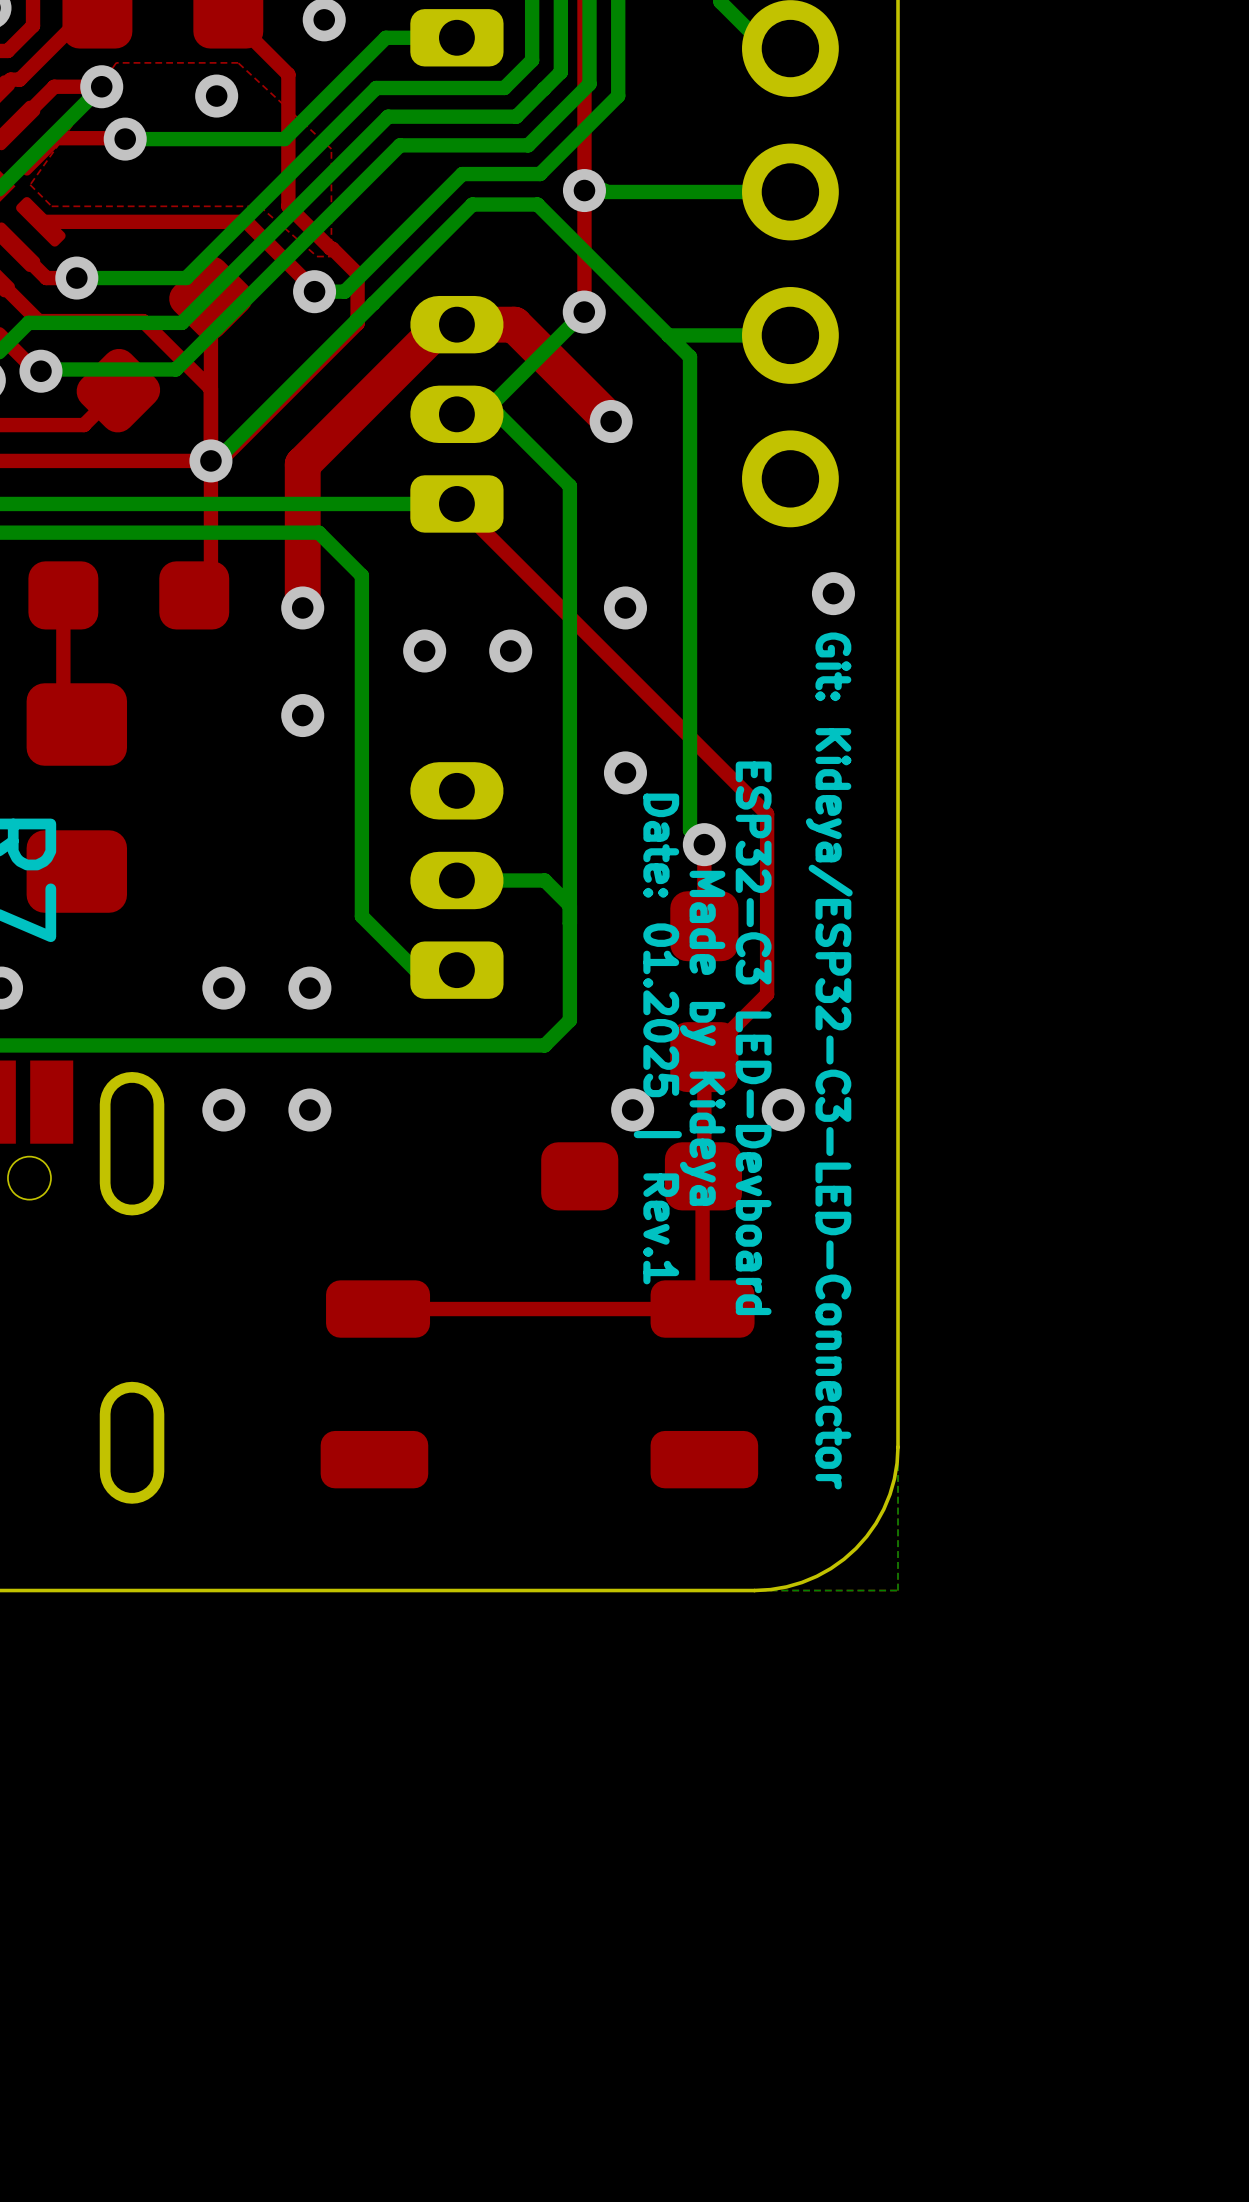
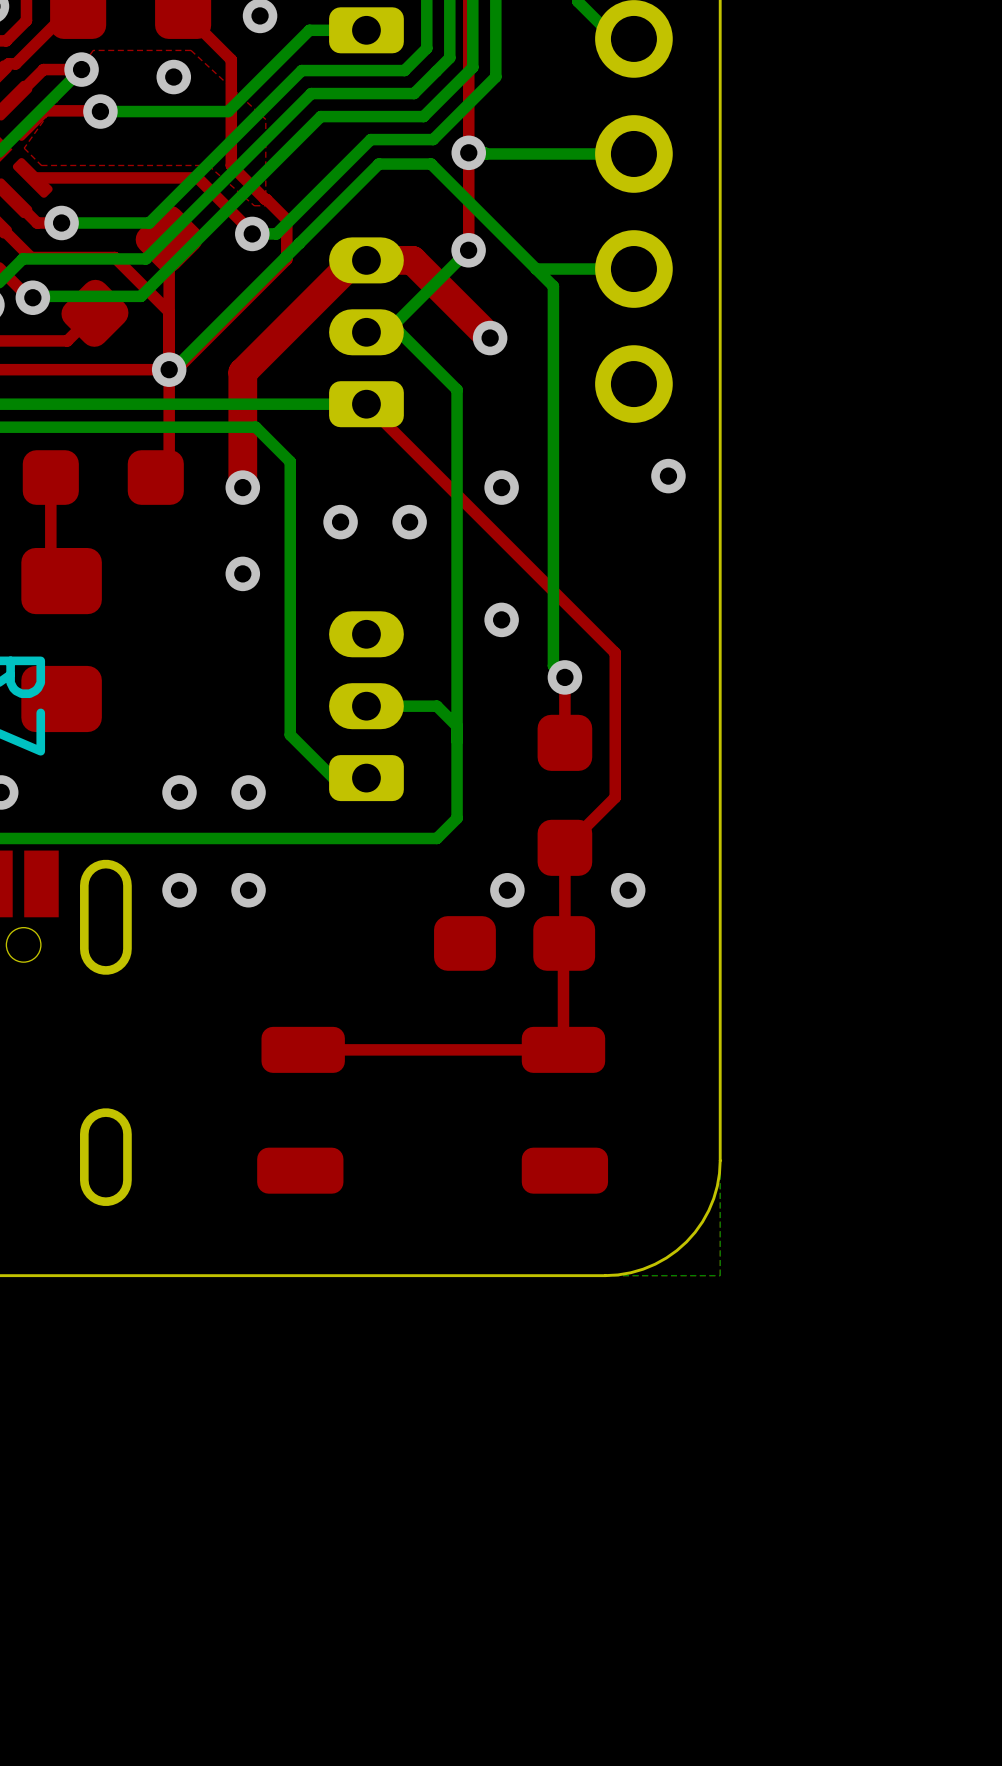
text: Date: 01.2025 | Rev.1 (657, 1038) -> none
text: Made by Kideya (702, 1038) -> none
text: ESP32-C3 LED-Devboard (753, 1038) -> none
text: Git: Kideya/ESP32-C3-LED-Connector (829, 1060) -> none

